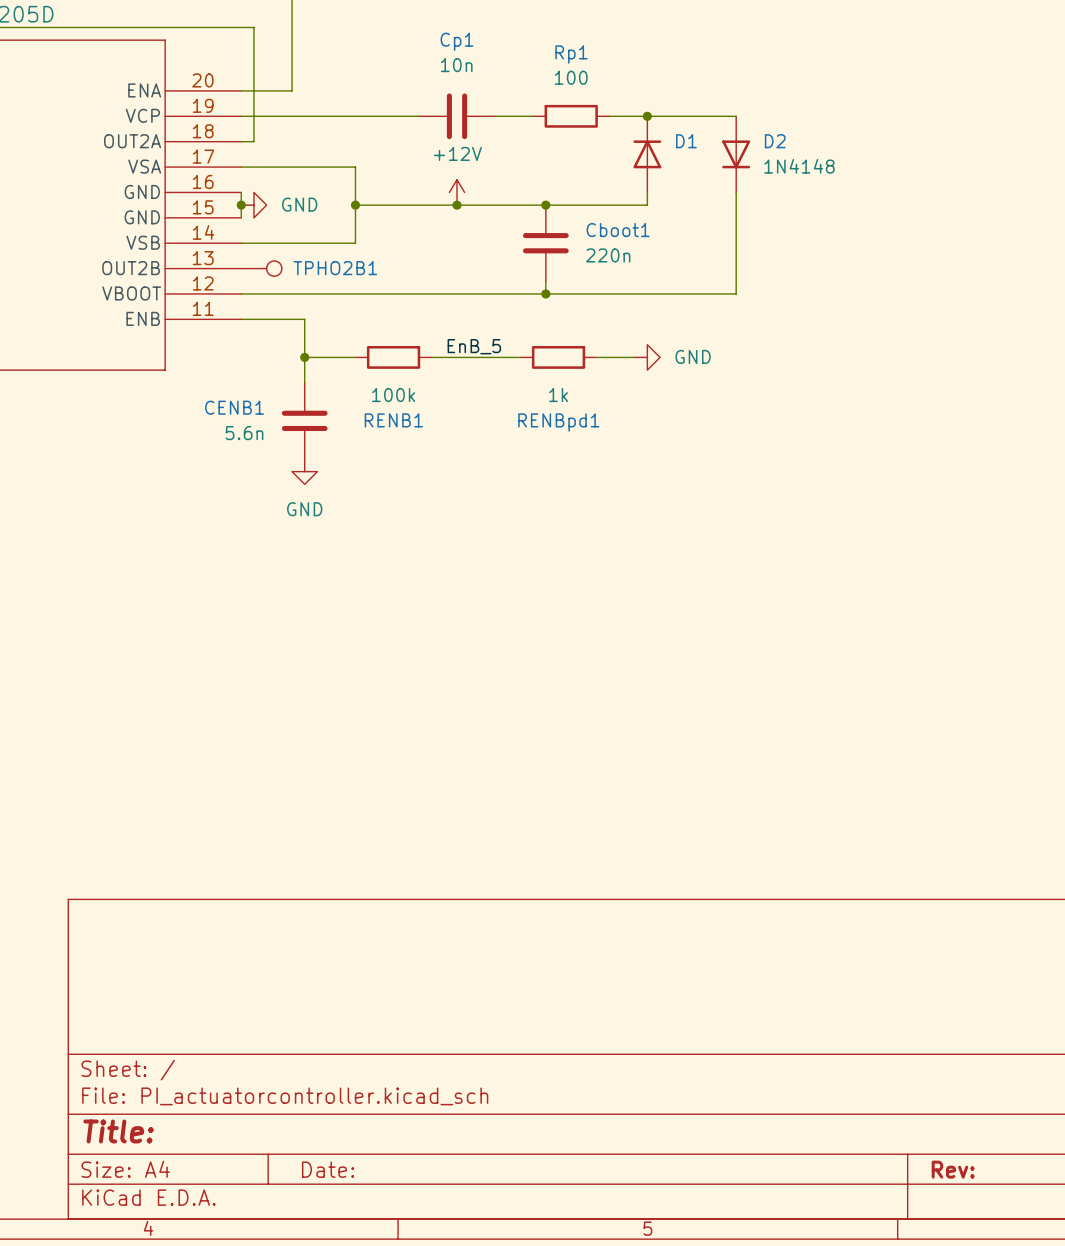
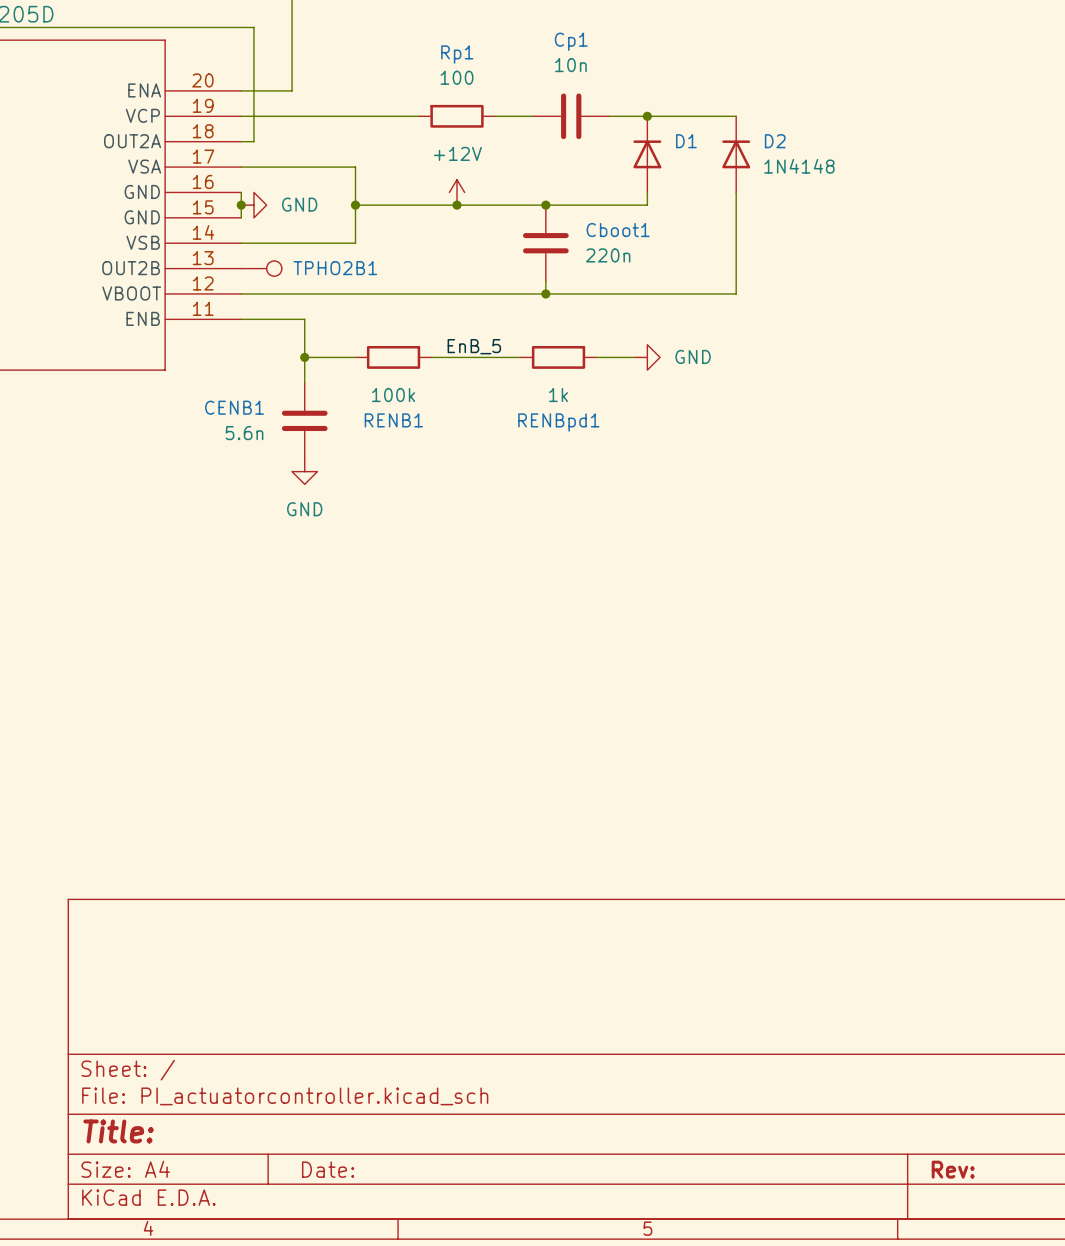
Cp1 position: (457, 116) -> (571, 116)
Rp1 position: (571, 116) -> (457, 116)
D2 rotation: 0° (736, 154) -> 180° (736, 154)

